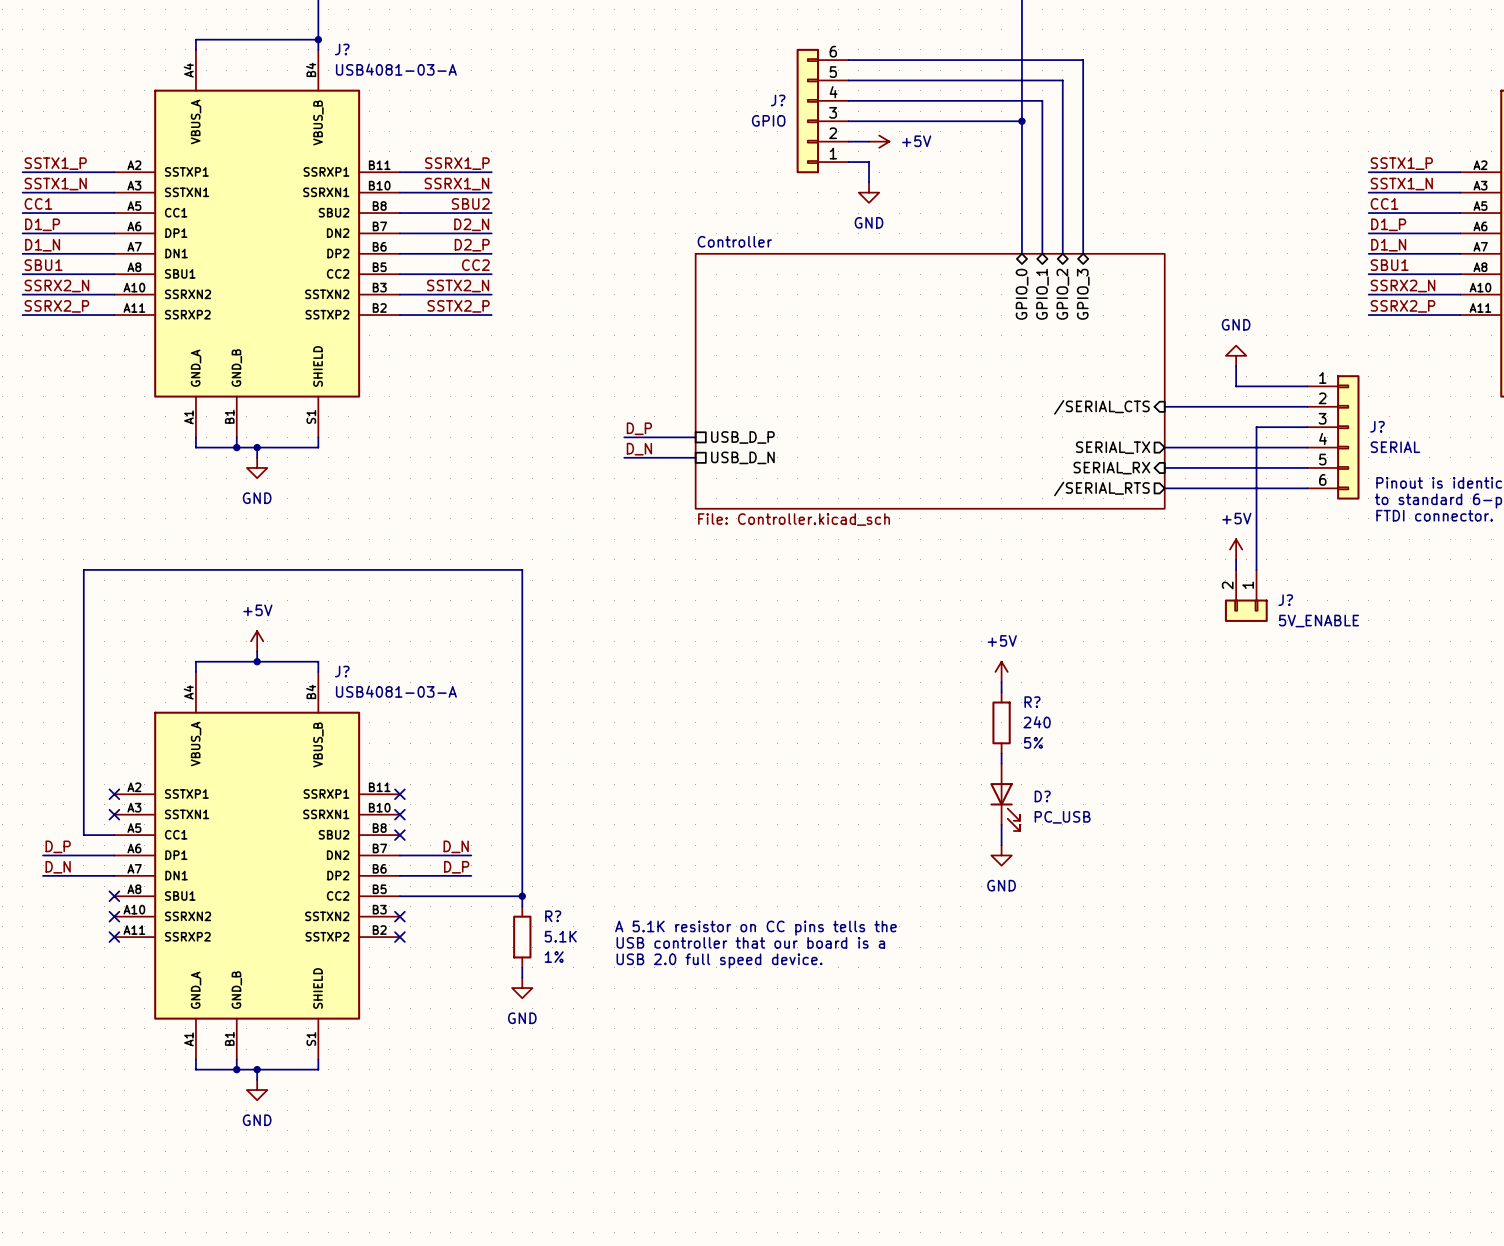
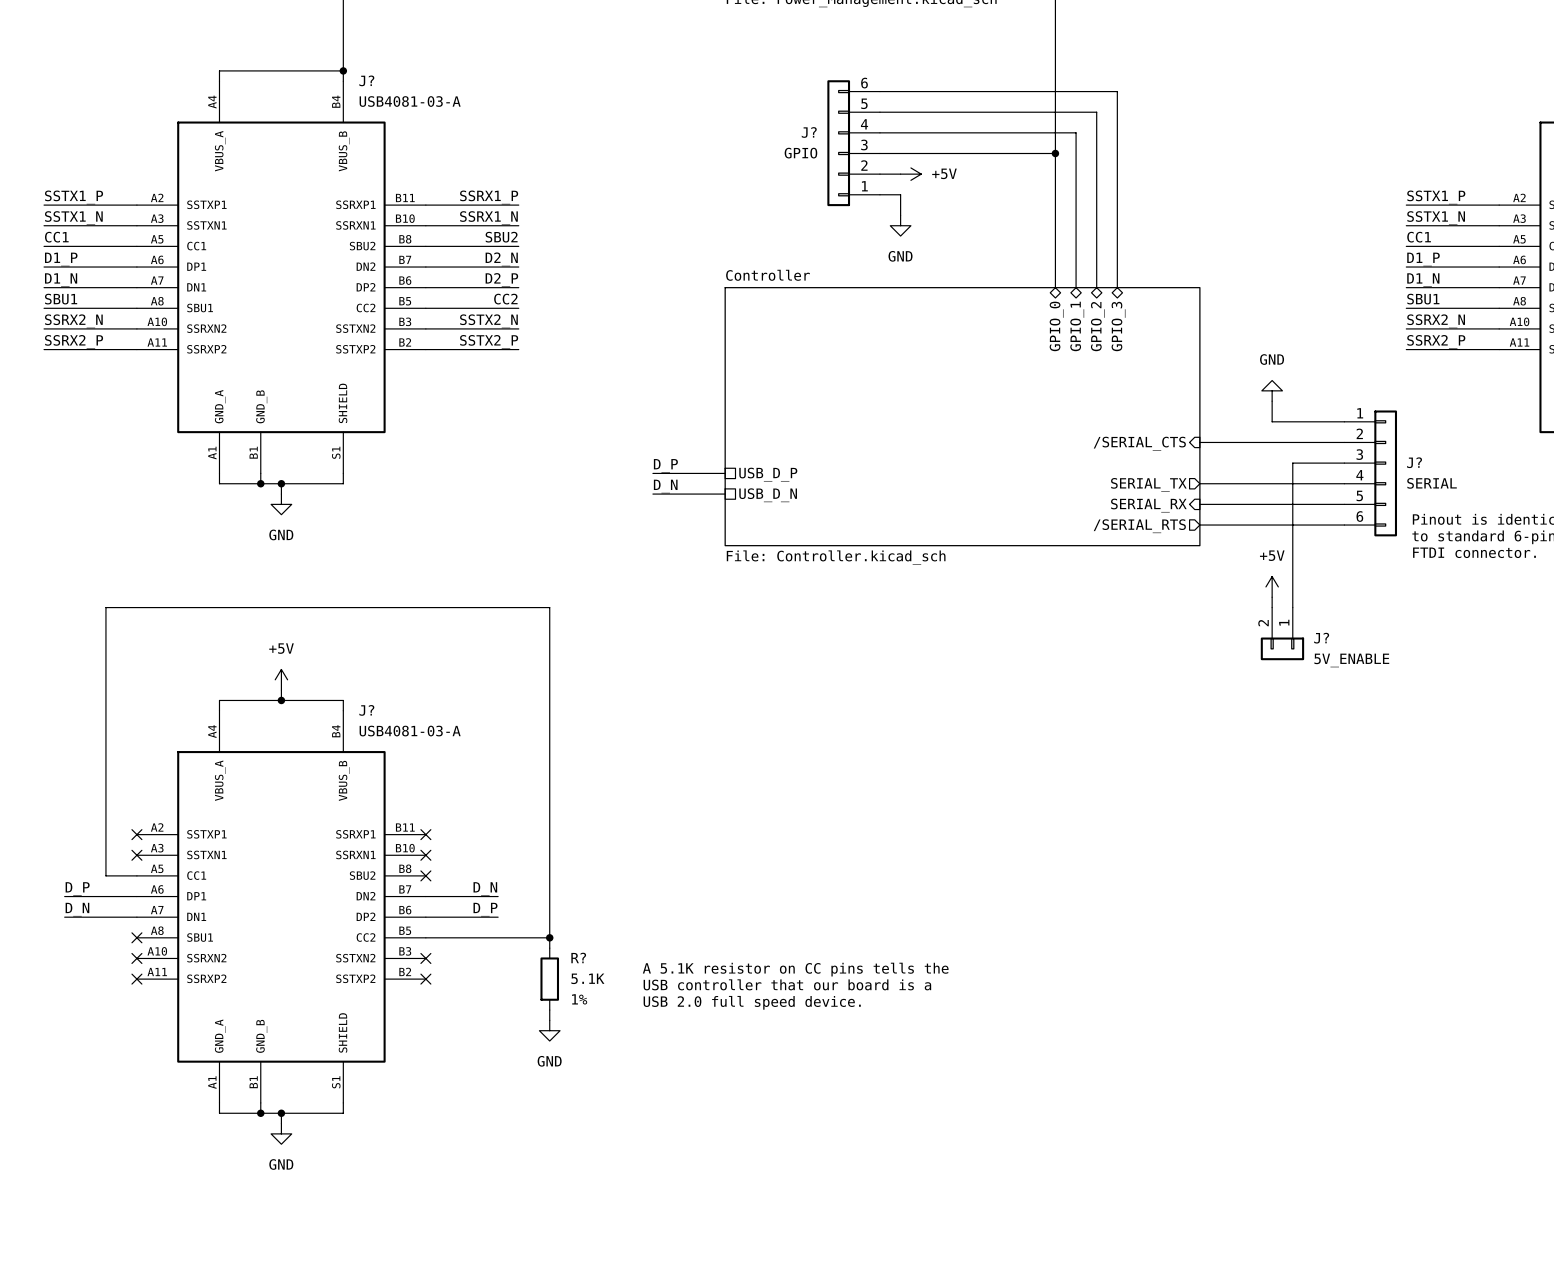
power symbol: +5V (1001, 671) -> none
wire: (1001, 682) (1001, 692) -> none
R?: 240 (1001, 722) -> none
wire: (1001, 753) (1001, 763) -> none
D?: PC_USB (1005, 797) -> none
wire: (1001, 824) (1001, 845) -> none
power symbol: GND (1001, 855) -> none

